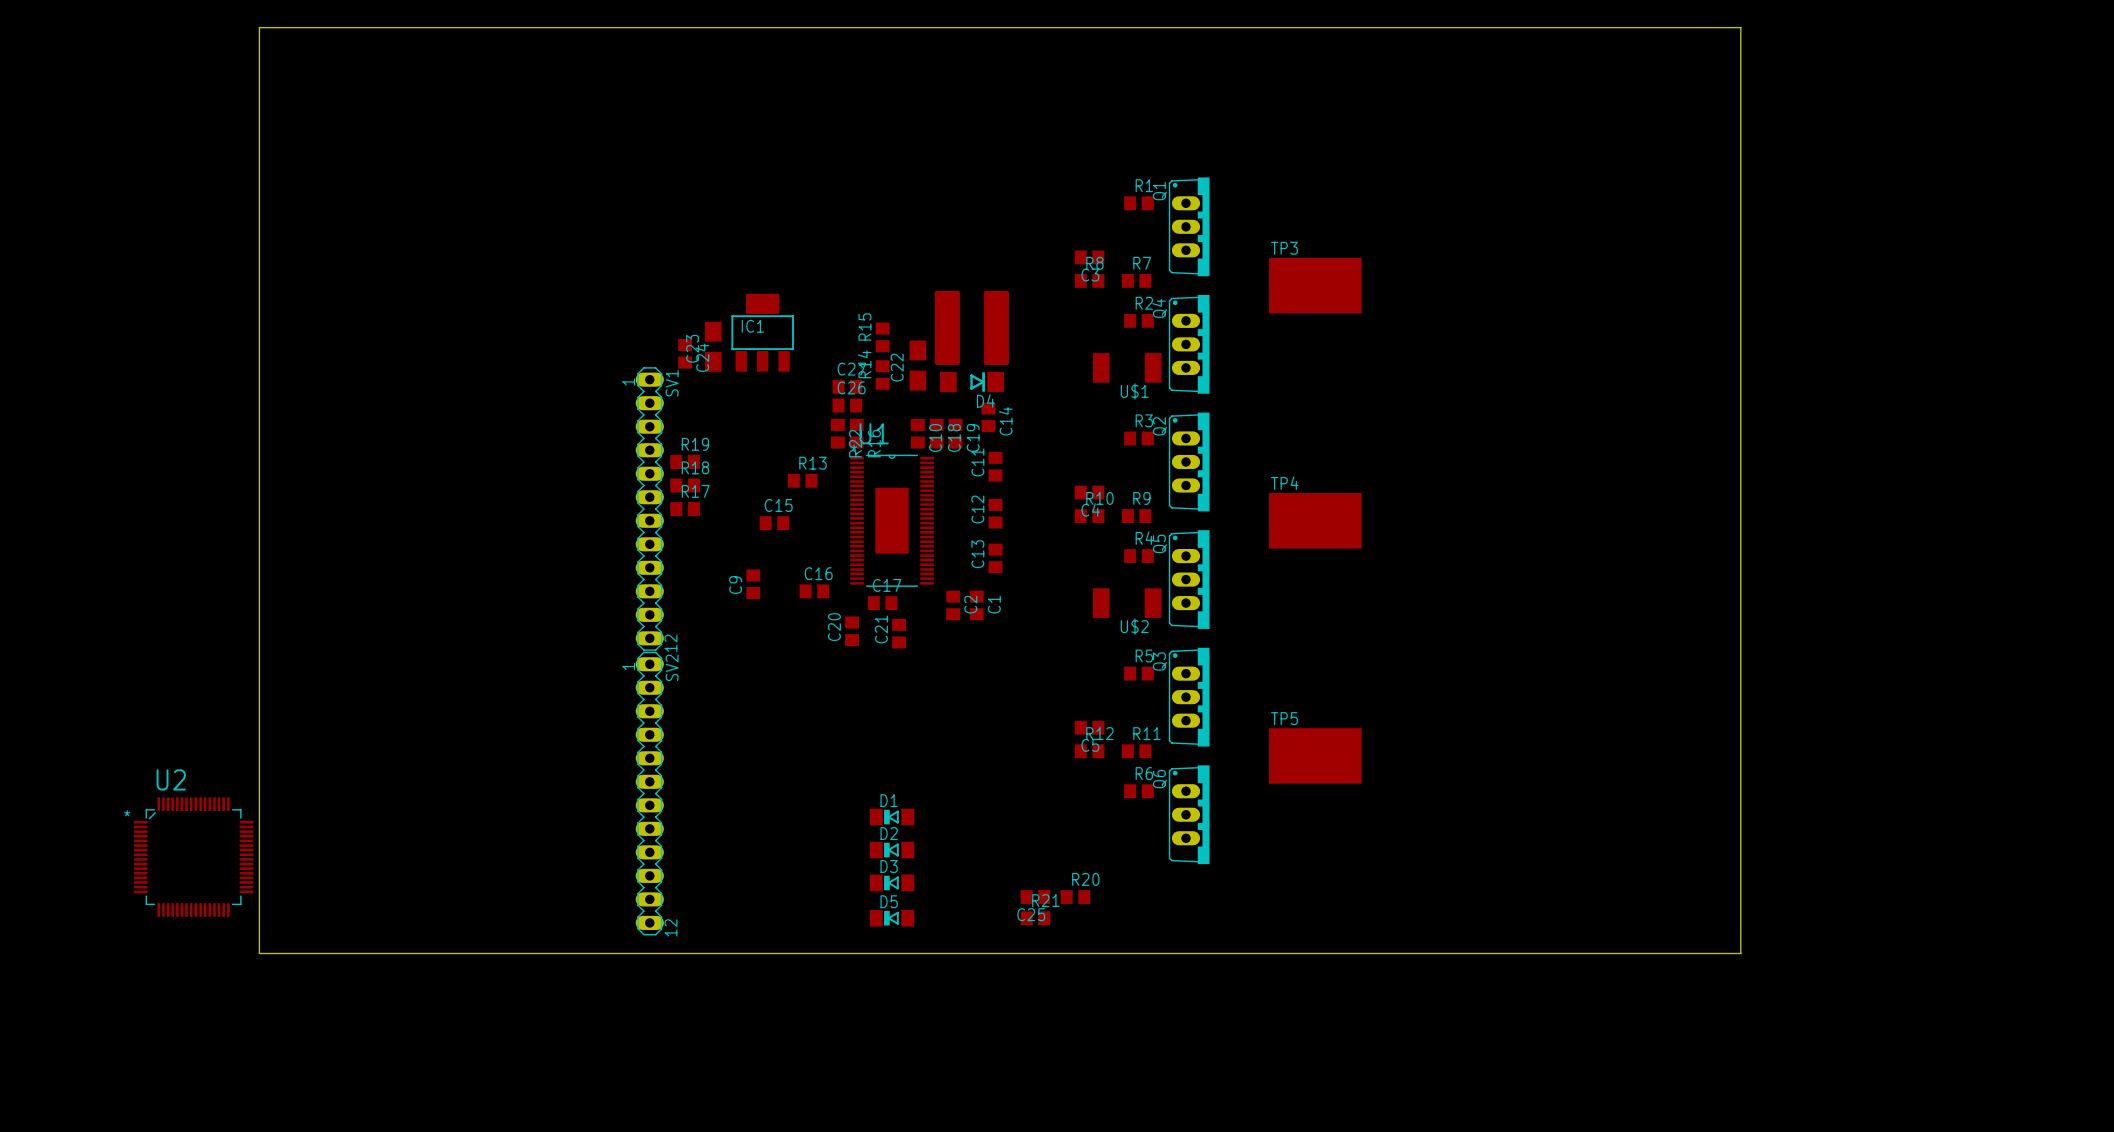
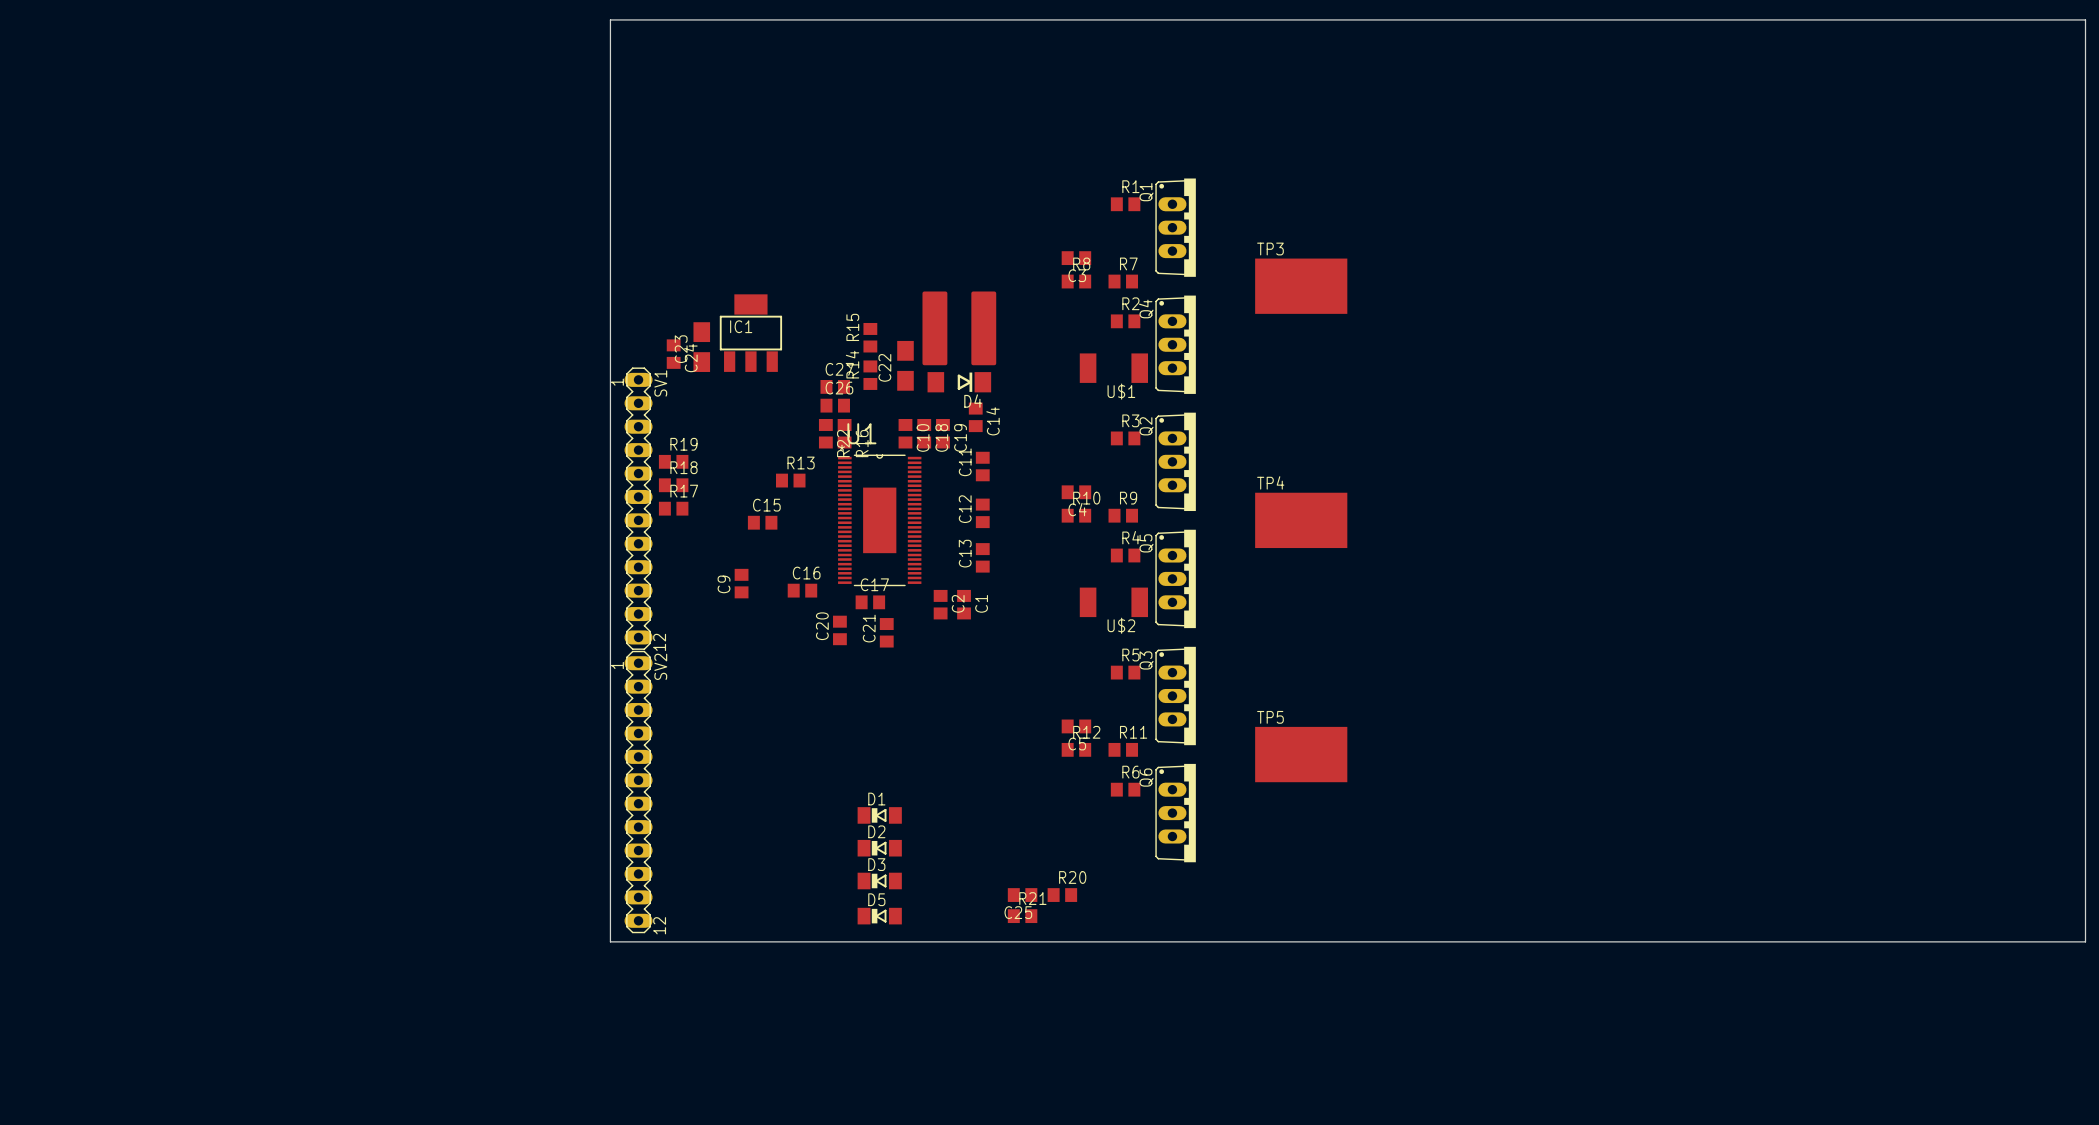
board edge: (259, 27) (1740, 27) (1740, 953) (259, 953) (259, 27) -> (610, 19) (610, 941) (2085, 941) (2085, 19) (610, 19)
U2: (193, 857) -> none

